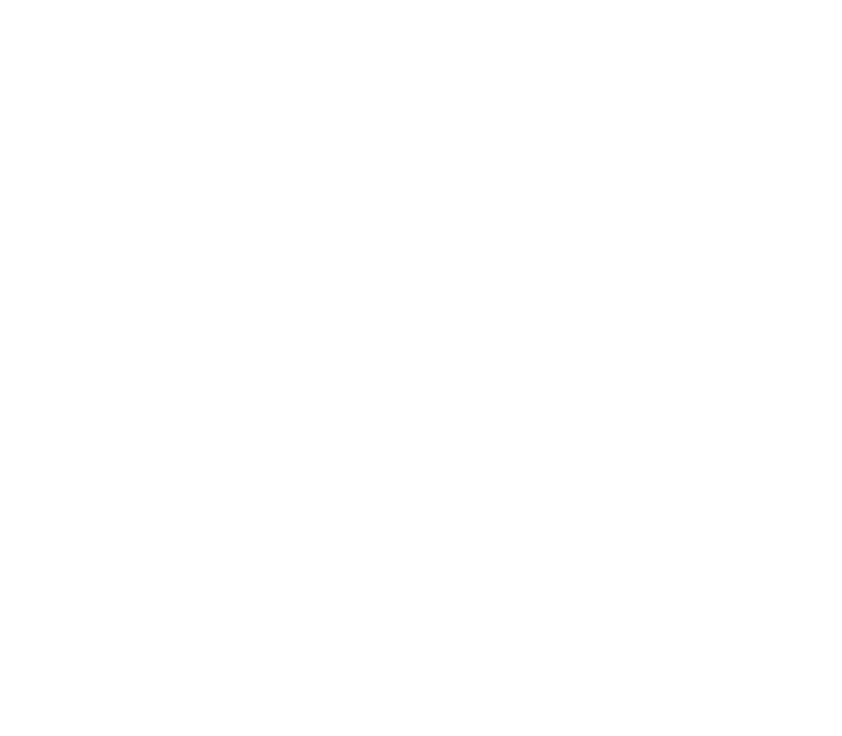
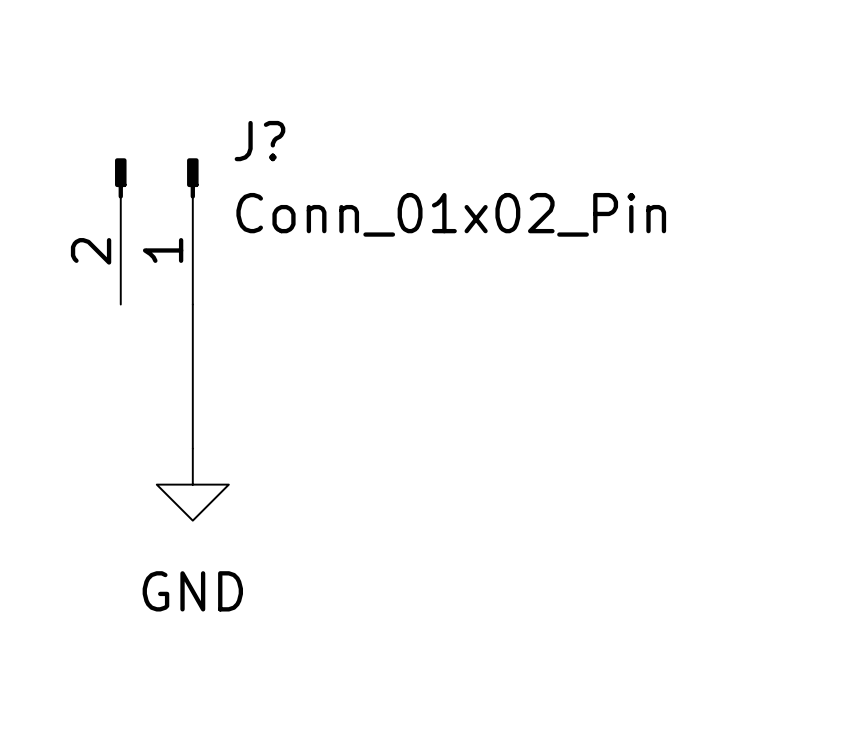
J?: none -> Conn_01x02_Pin (156, 231)
wire: none -> (192, 304) (192, 448)
power symbol: none -> GND (192, 484)

